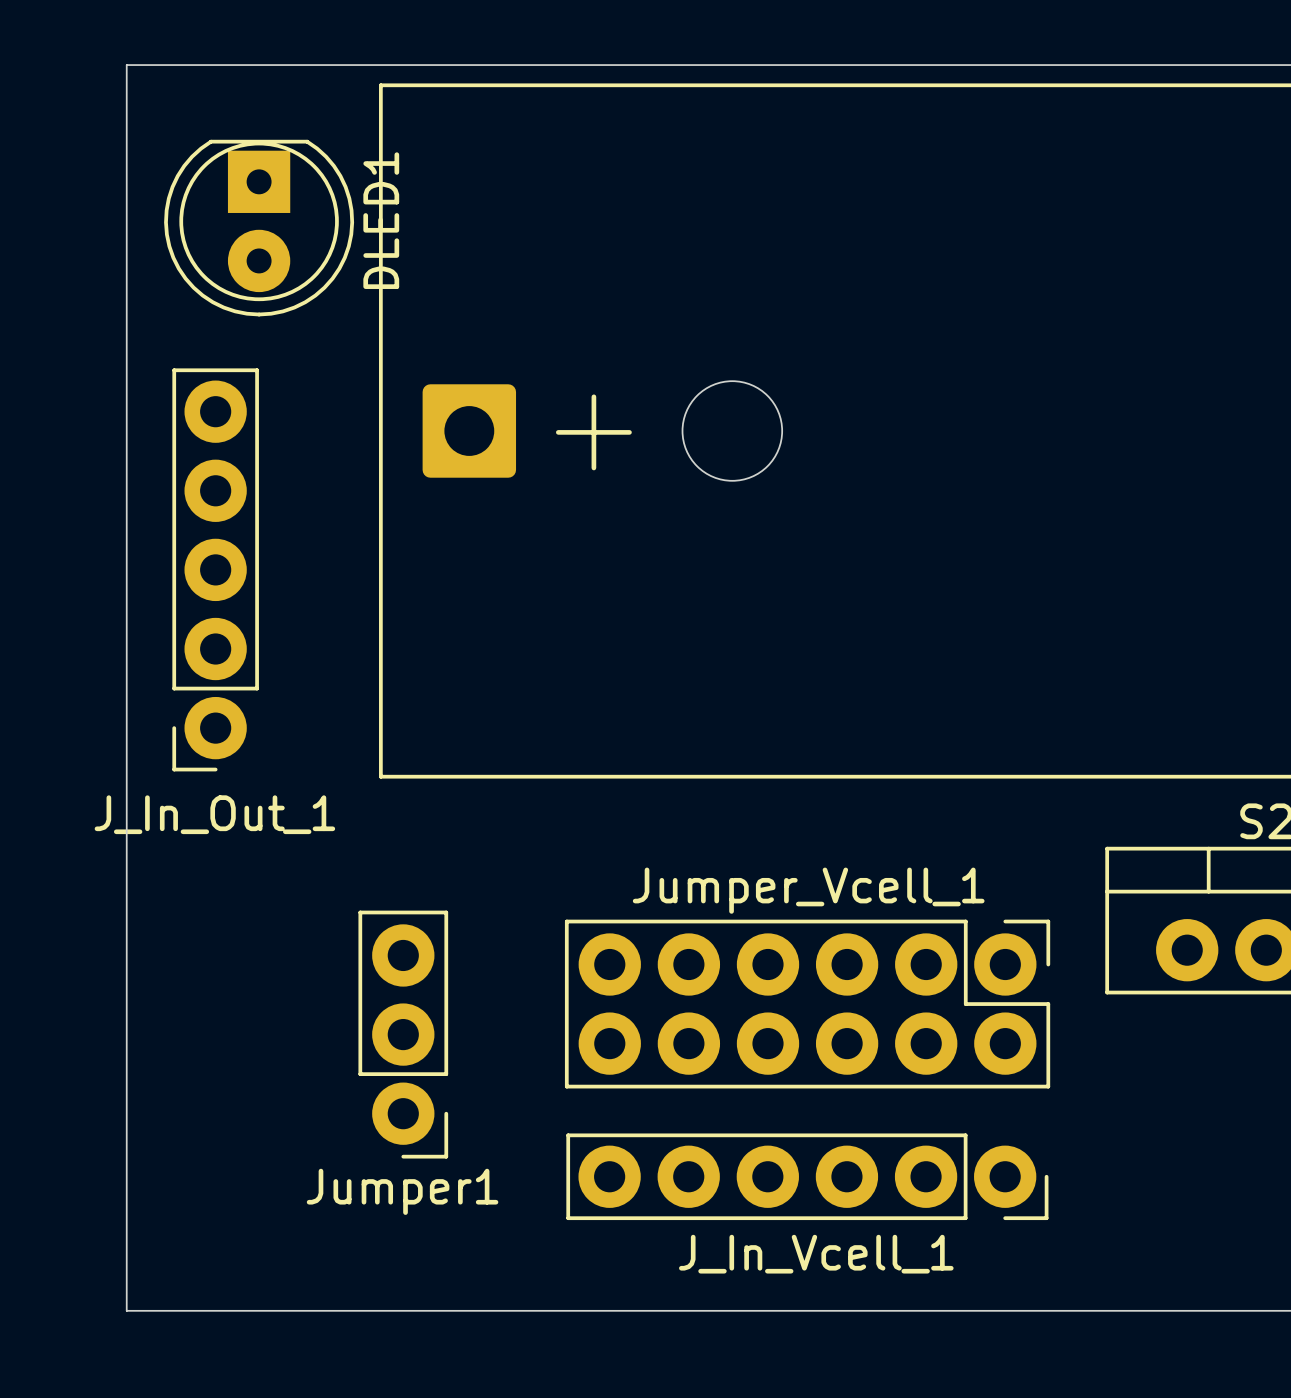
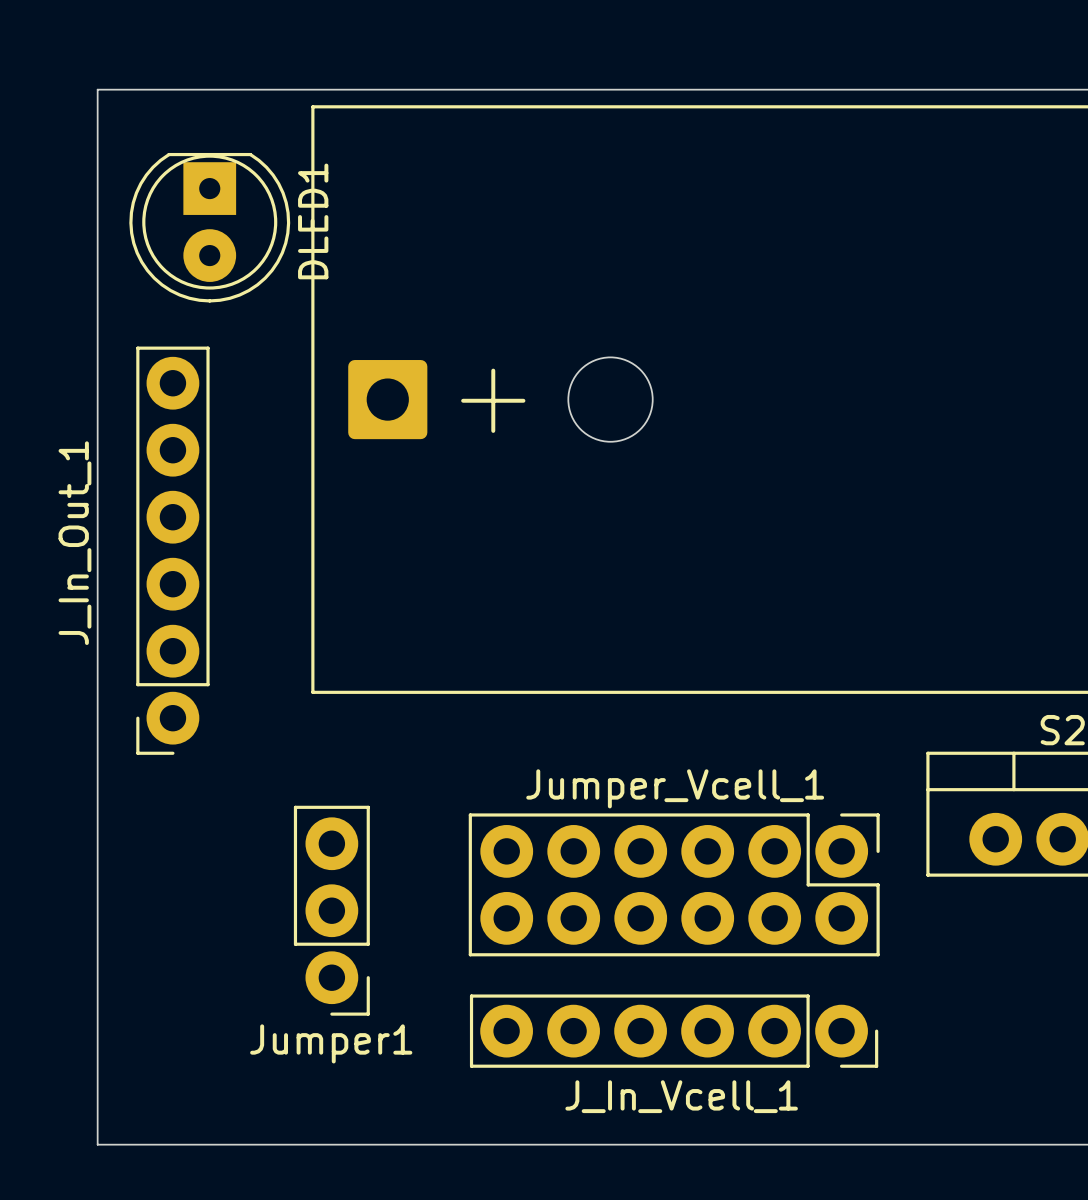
J_In_Out_1 footprint: [172, 368, 259, 772] -> [136, 346, 210, 755]
J_In_Out_1 name position: J_In_Out_1 (214, 814) -> J_In_Out_1 (74, 543)

